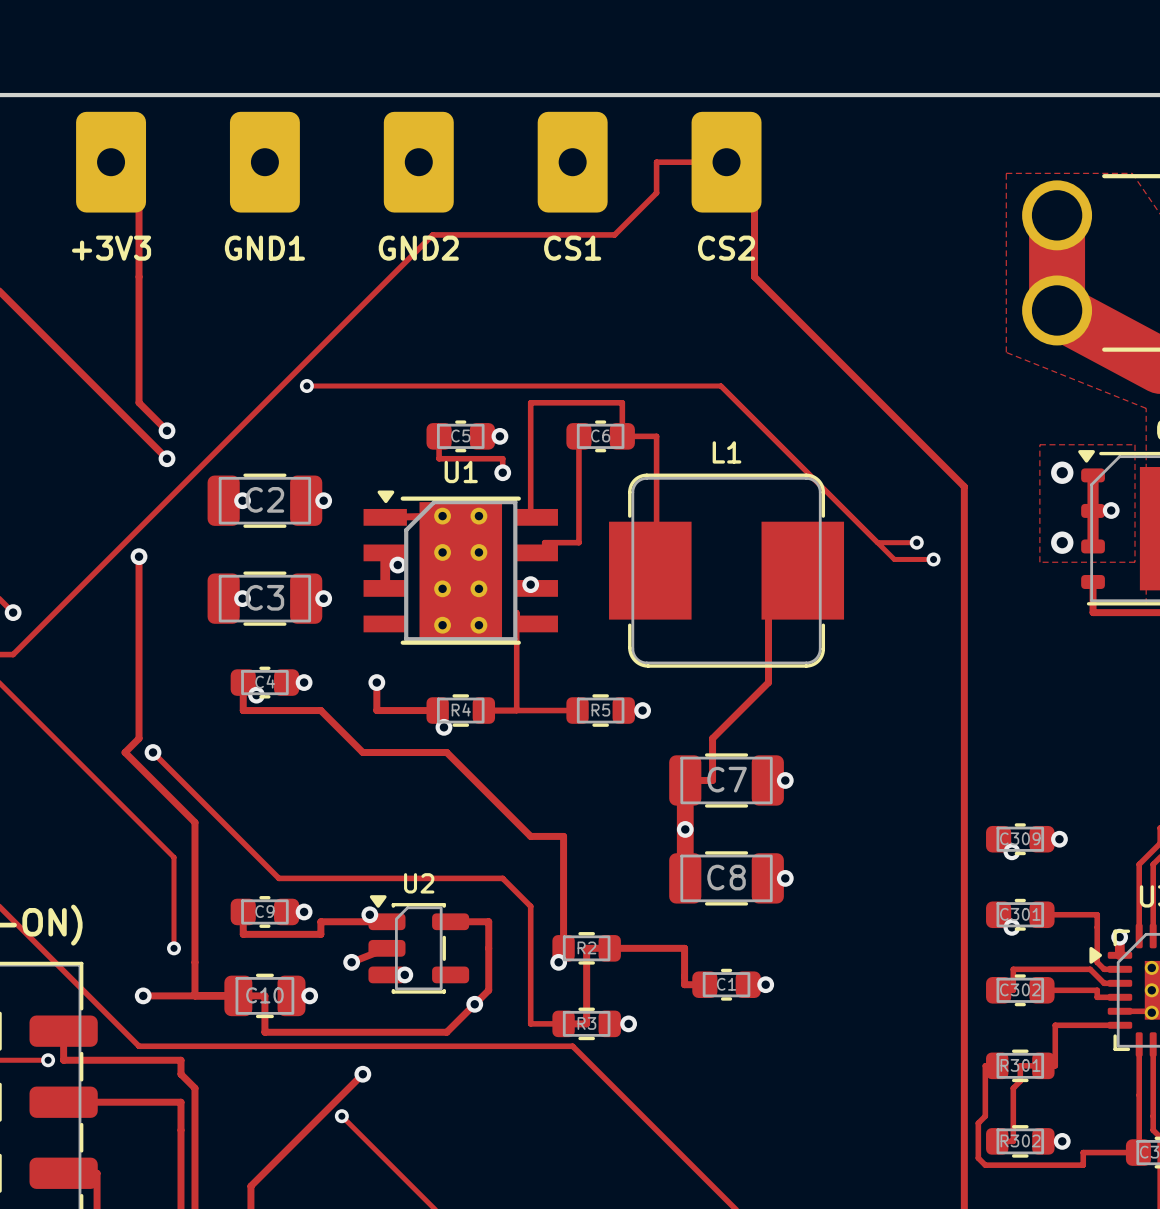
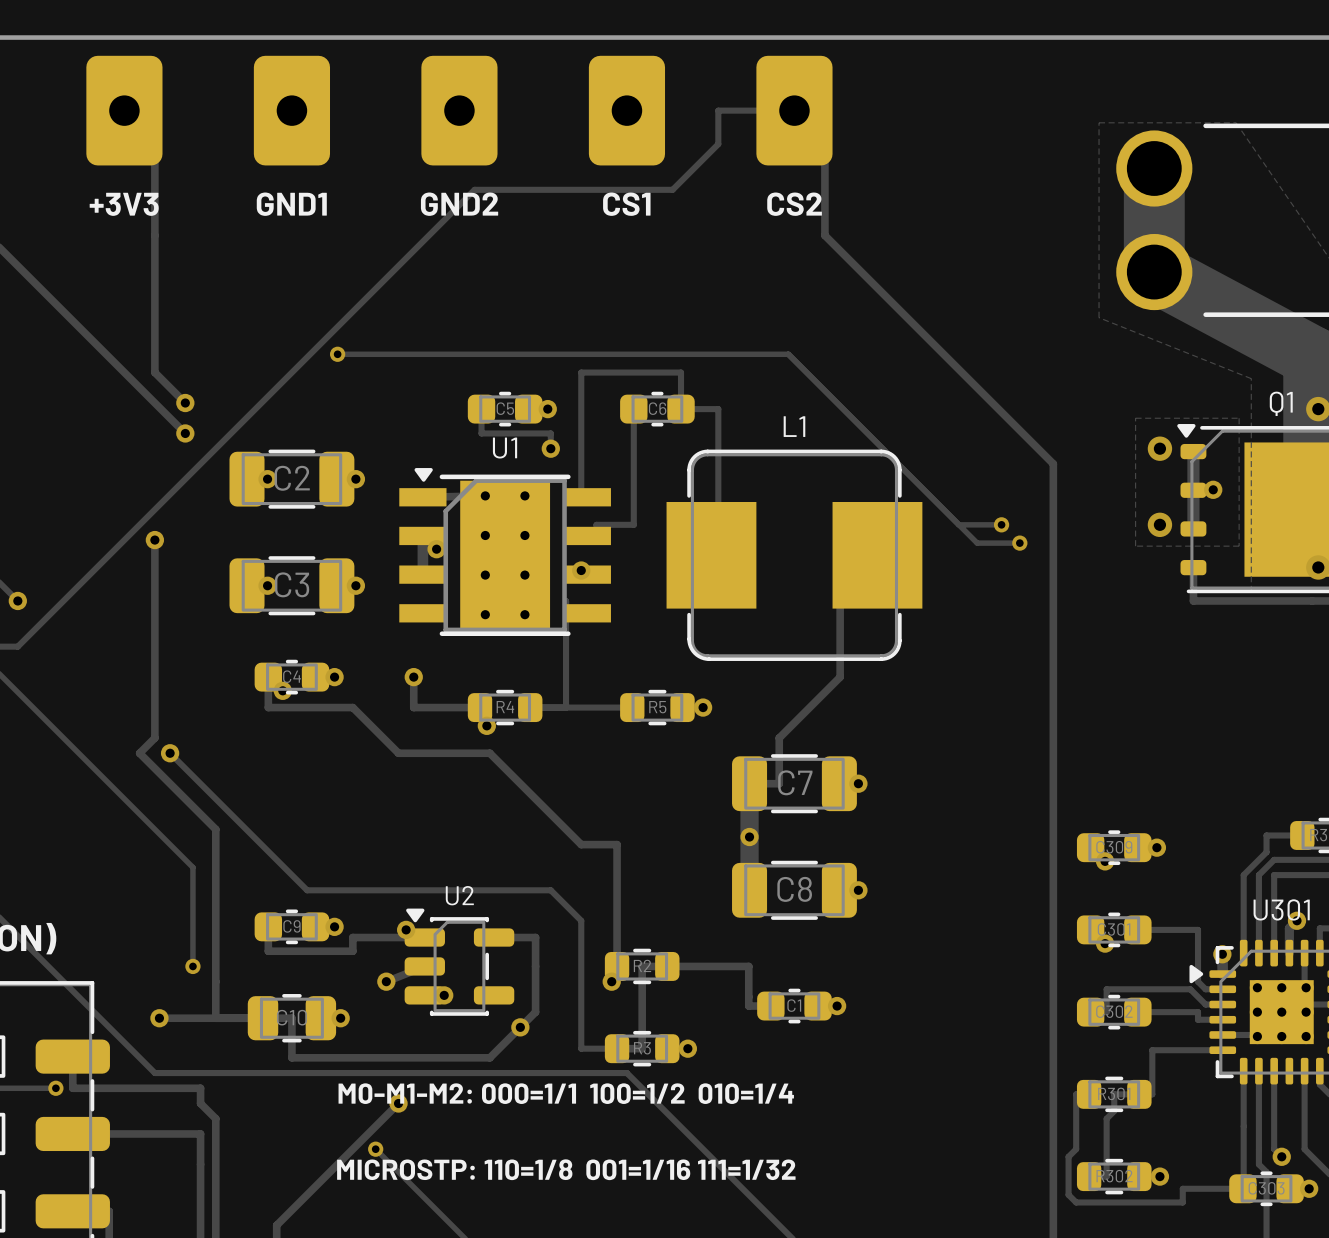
text: none -> M0-M1-M2: 000=1/1 100=1/2 010=1/4 (566, 1093)
text: none -> MICROSTP: 110=1/8 001=1/16 111=1/32 (566, 1169)

